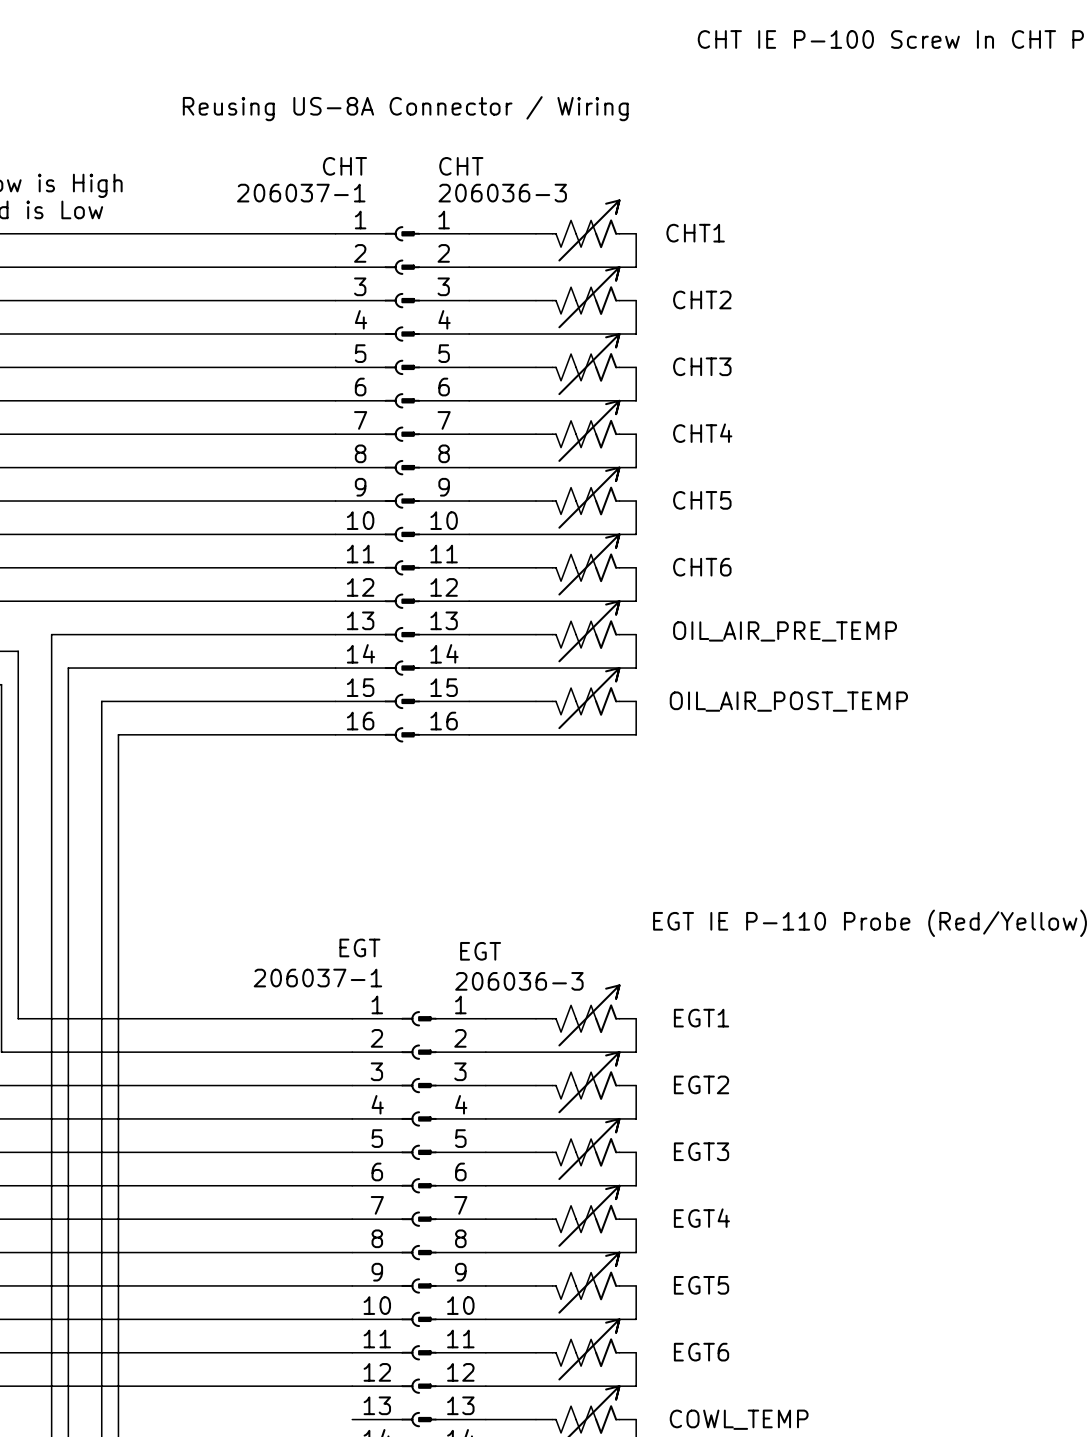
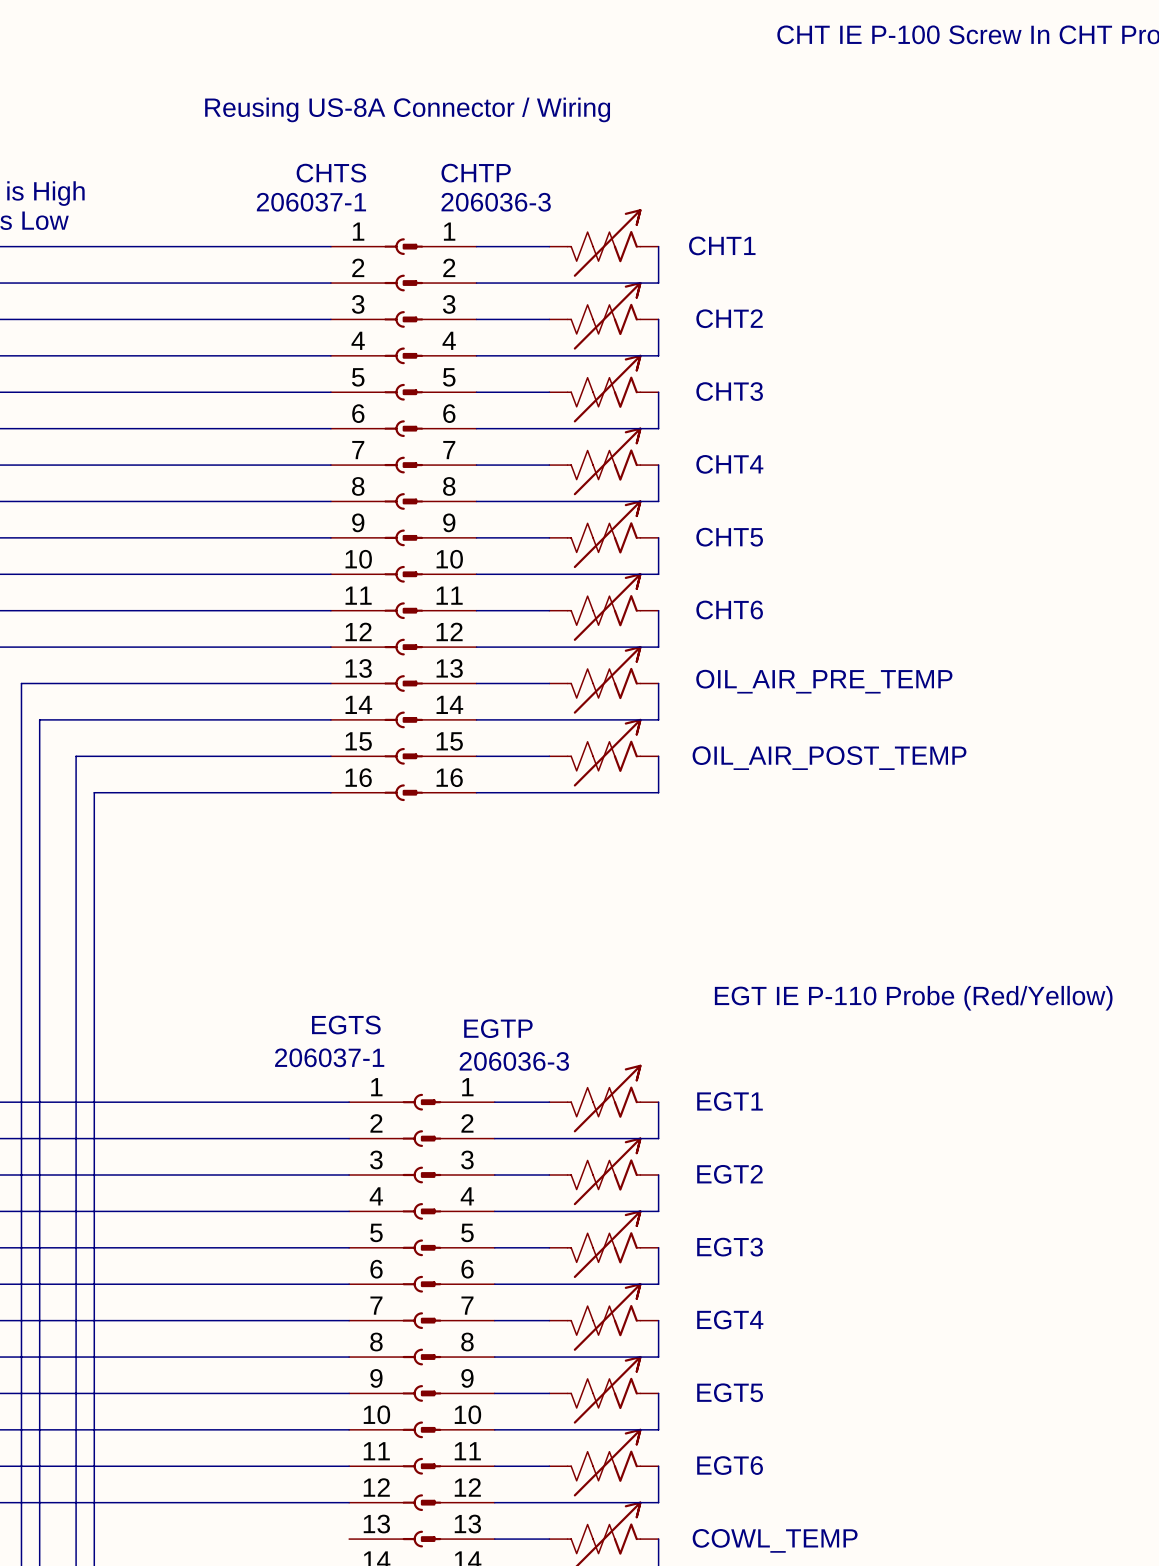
CHT name: CHT (344, 166) -> CHTS (331, 173)
CHT name: CHT (461, 166) -> CHTP (476, 173)
EGT name: EGT (359, 947) -> EGTS (346, 1025)
EGT name: EGT (480, 951) -> EGTP (498, 1028)

